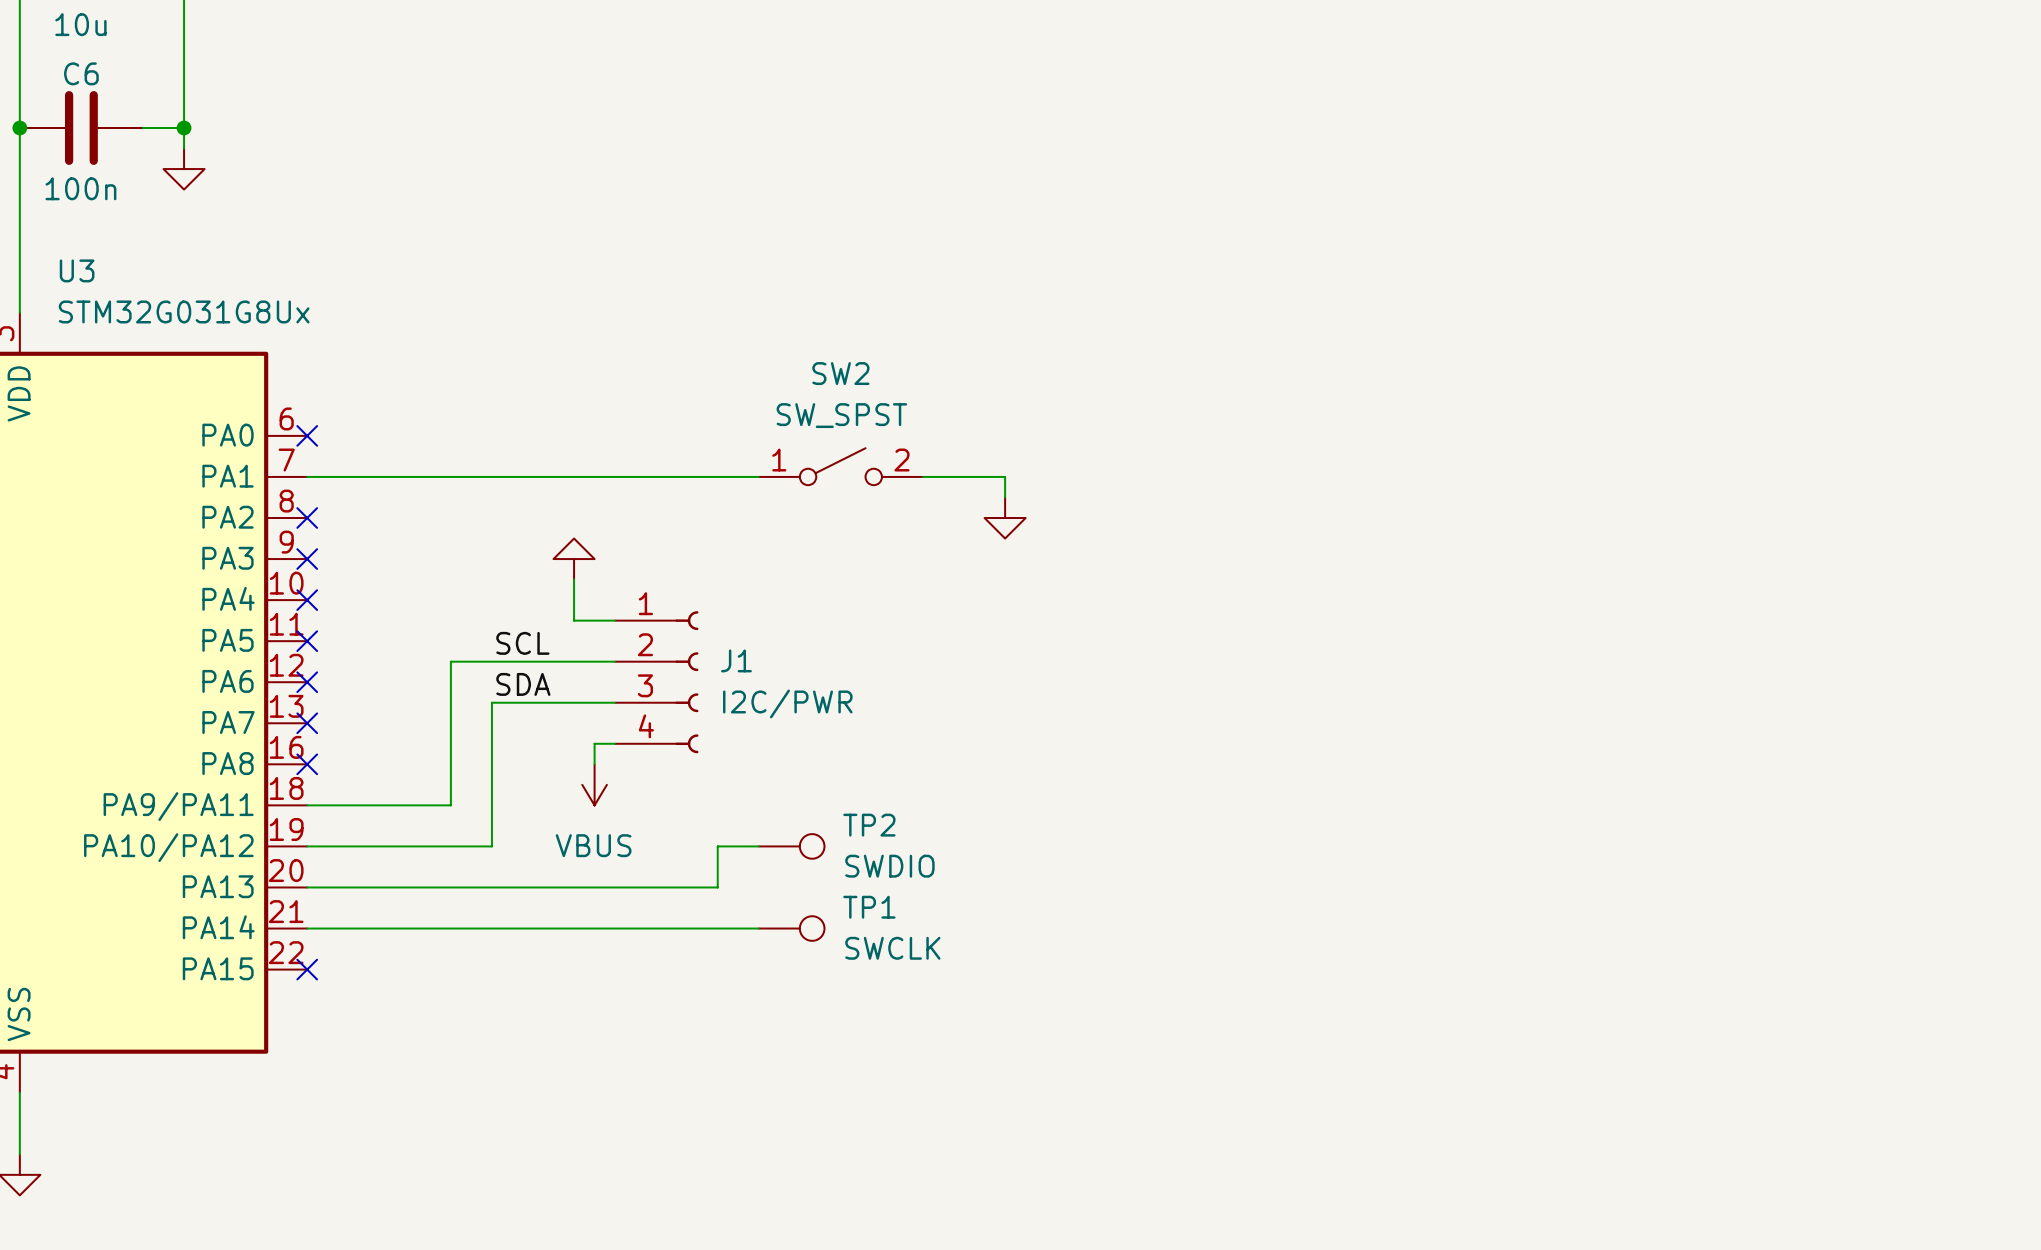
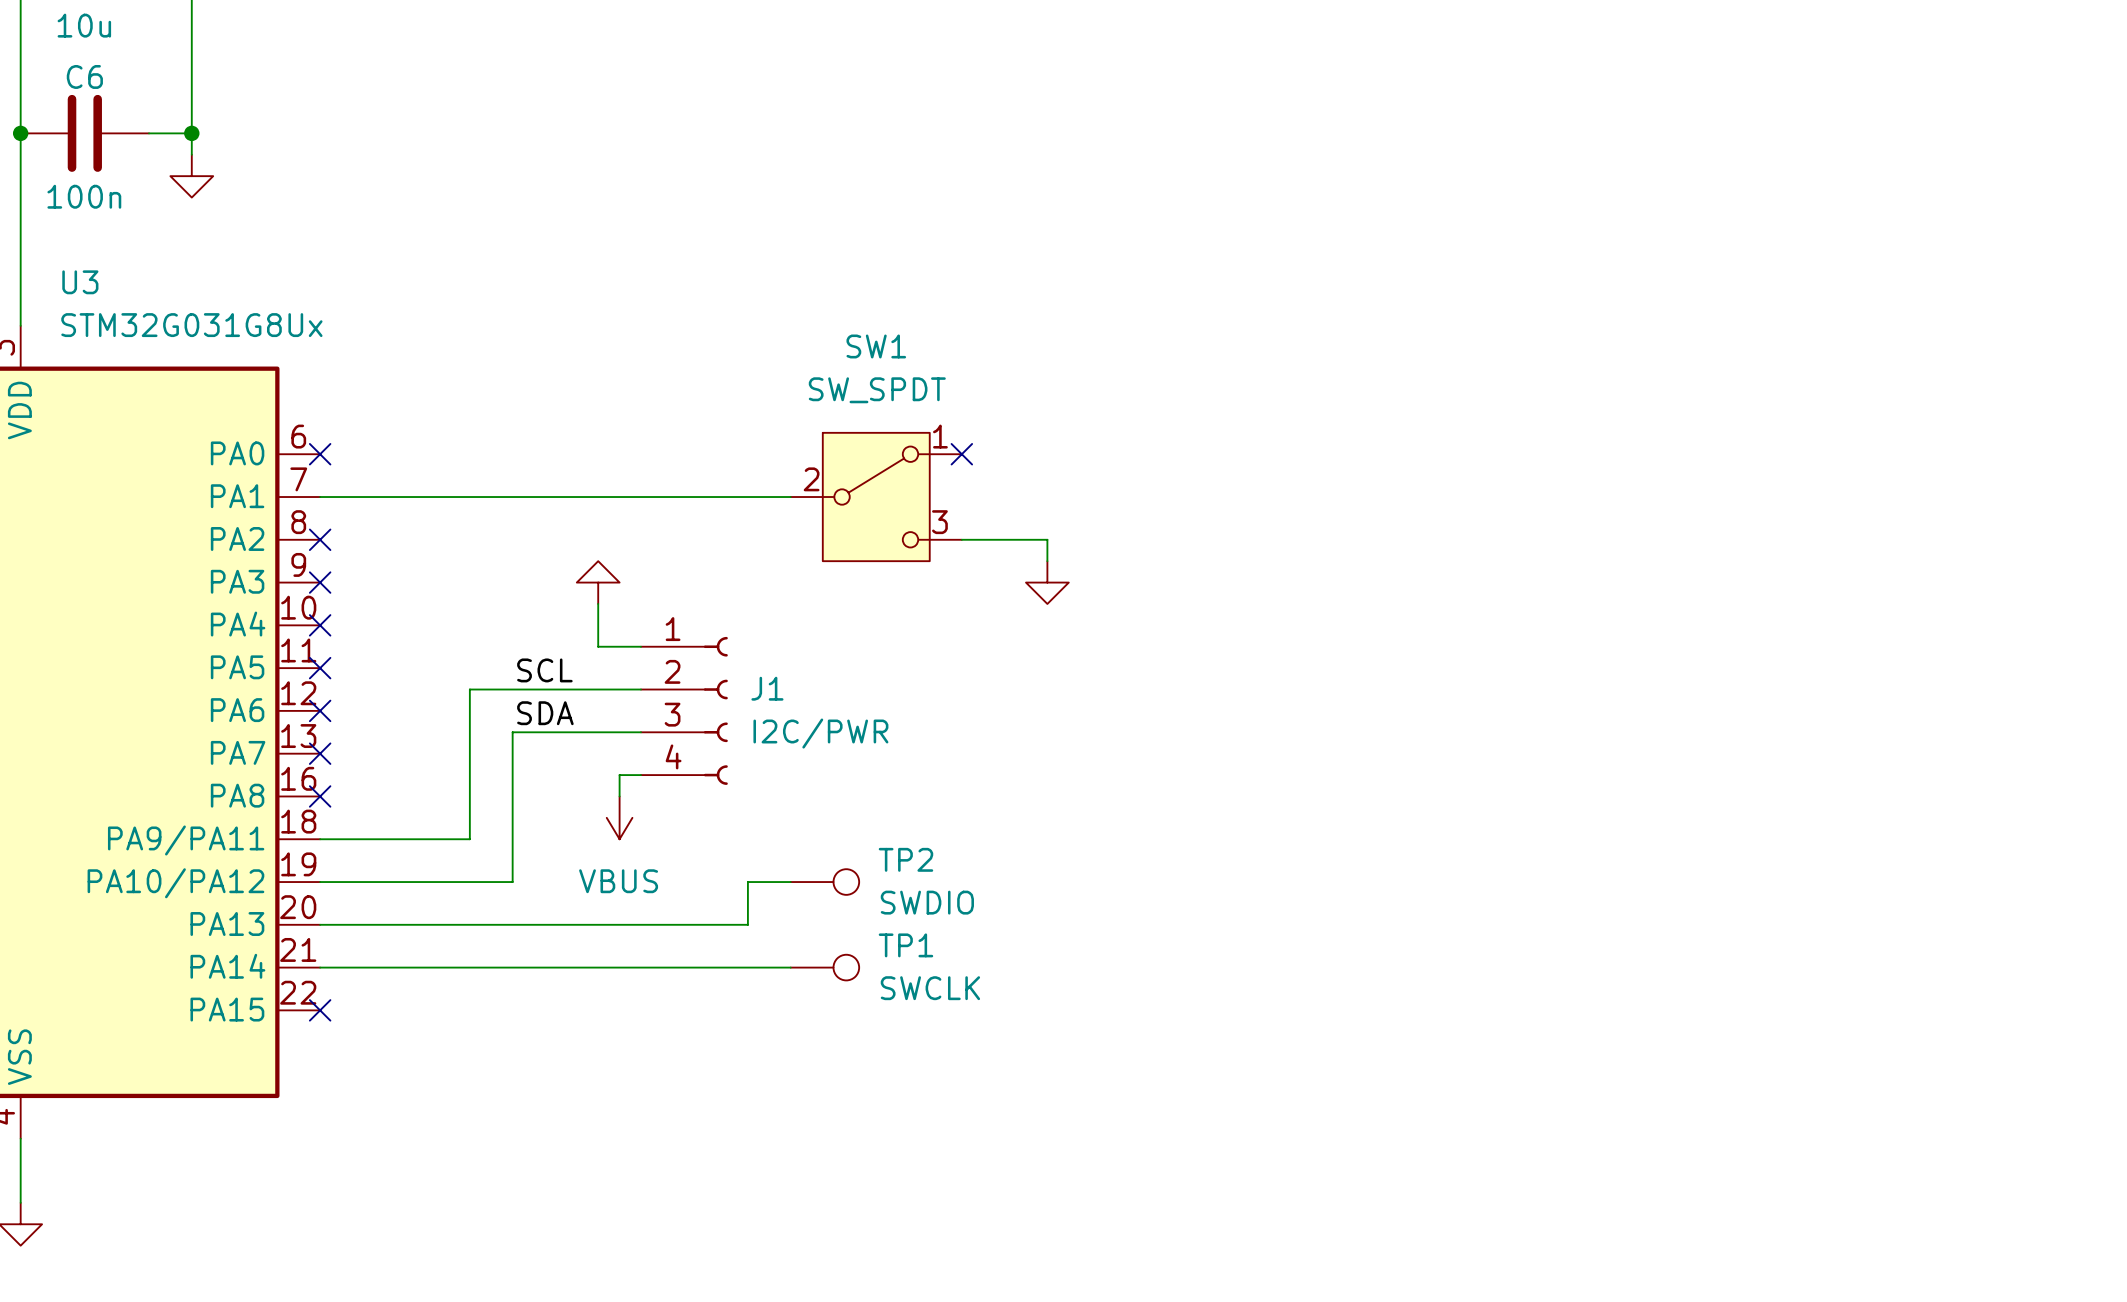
no-connect mark: none -> (961, 454)
SW2: SW_SPST (840, 466) -> none
SW1: none -> SW_SPDT (876, 497)
wire: (923, 476) (1005, 476) (1005, 497) -> (961, 539) (1047, 539) (1047, 561)
power symbol position: (1005, 518) -> (1047, 582)

